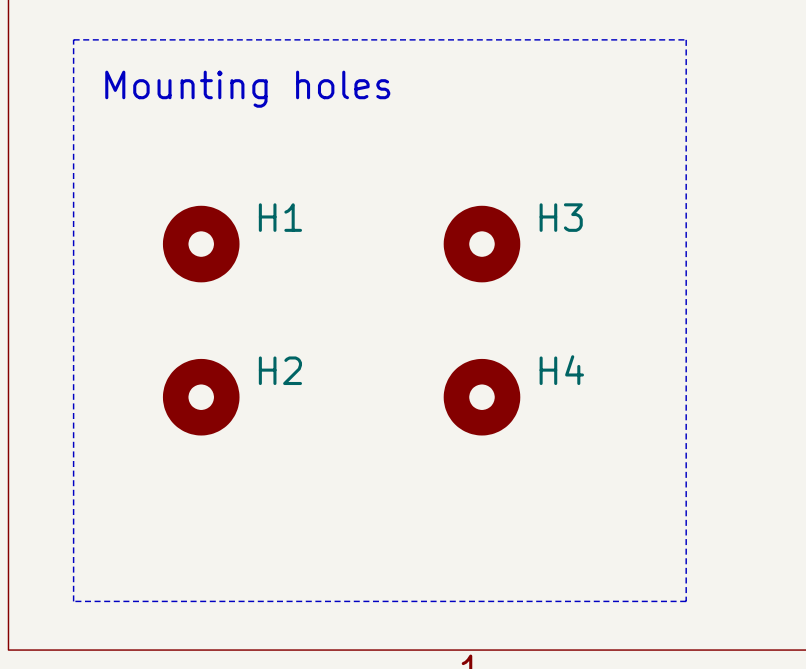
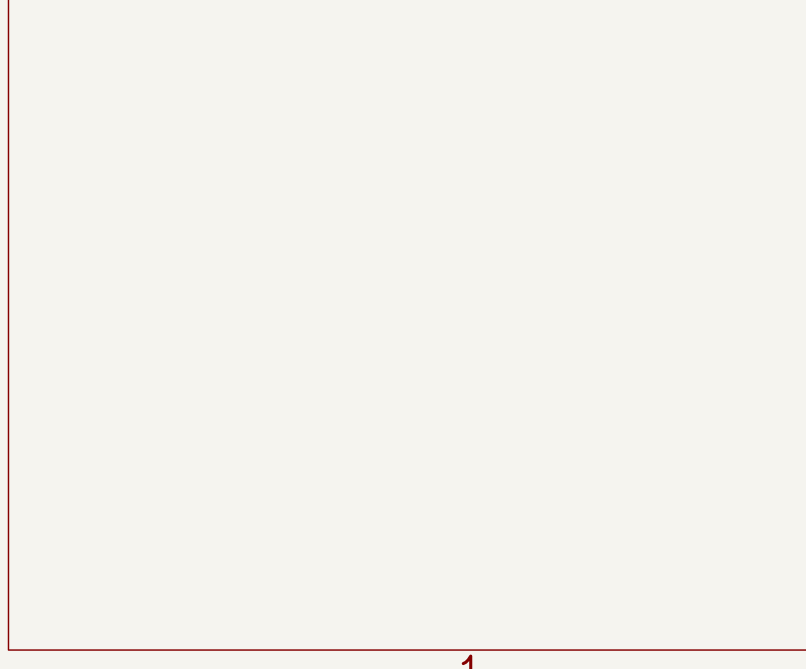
line: (73, 39) (686, 39) (686, 601) (73, 601) (73, 39) -> none
text: Mounting holes (247, 89) -> none
H1: (201, 244) -> none
H3: (481, 244) -> none
H2: (201, 397) -> none
H4: (481, 397) -> none

